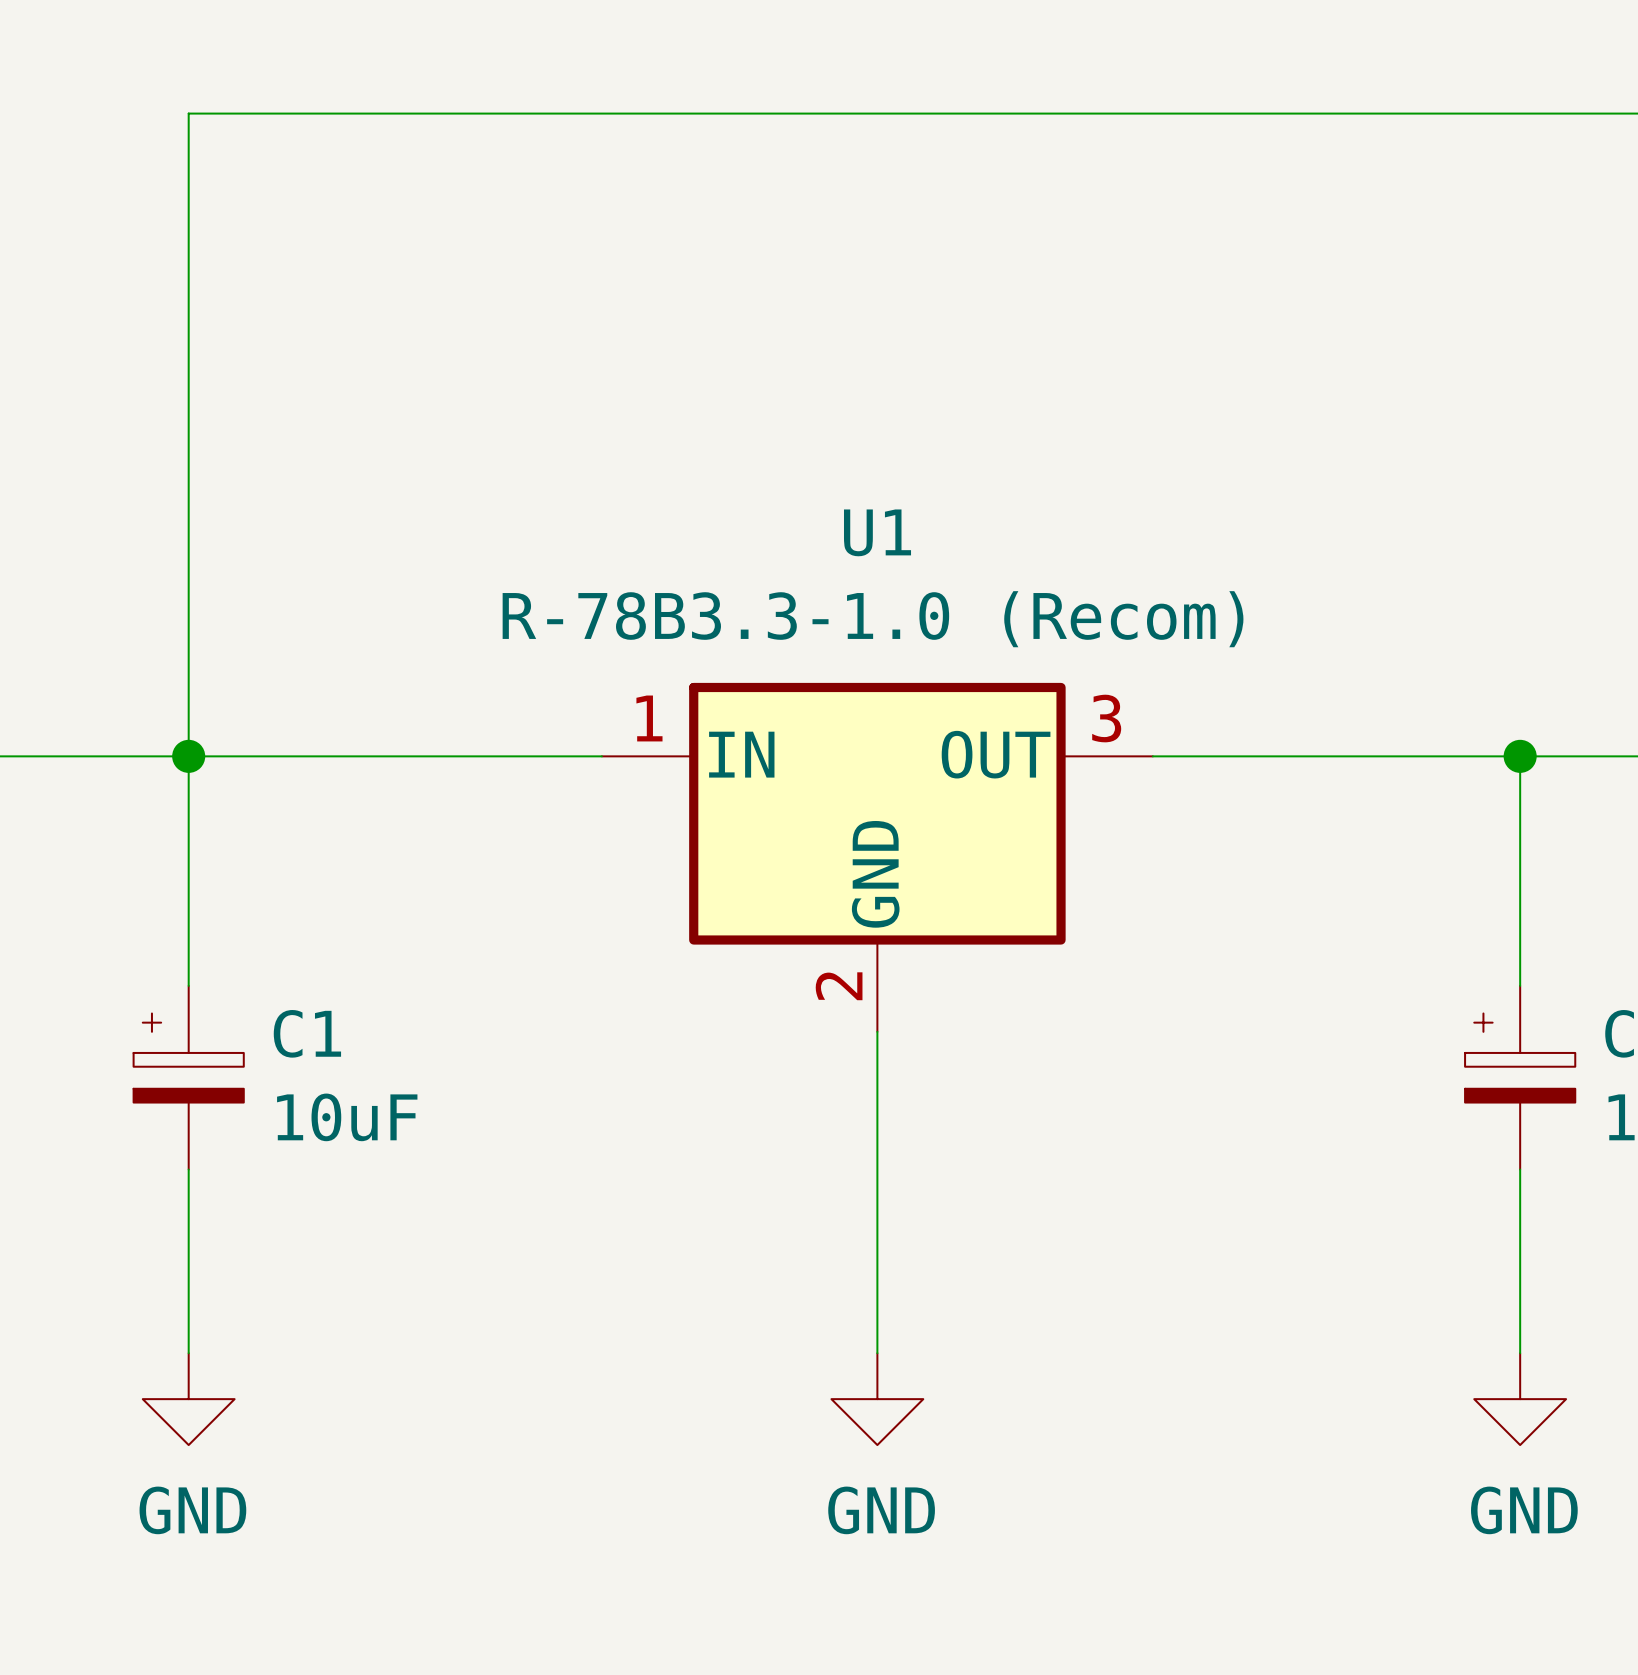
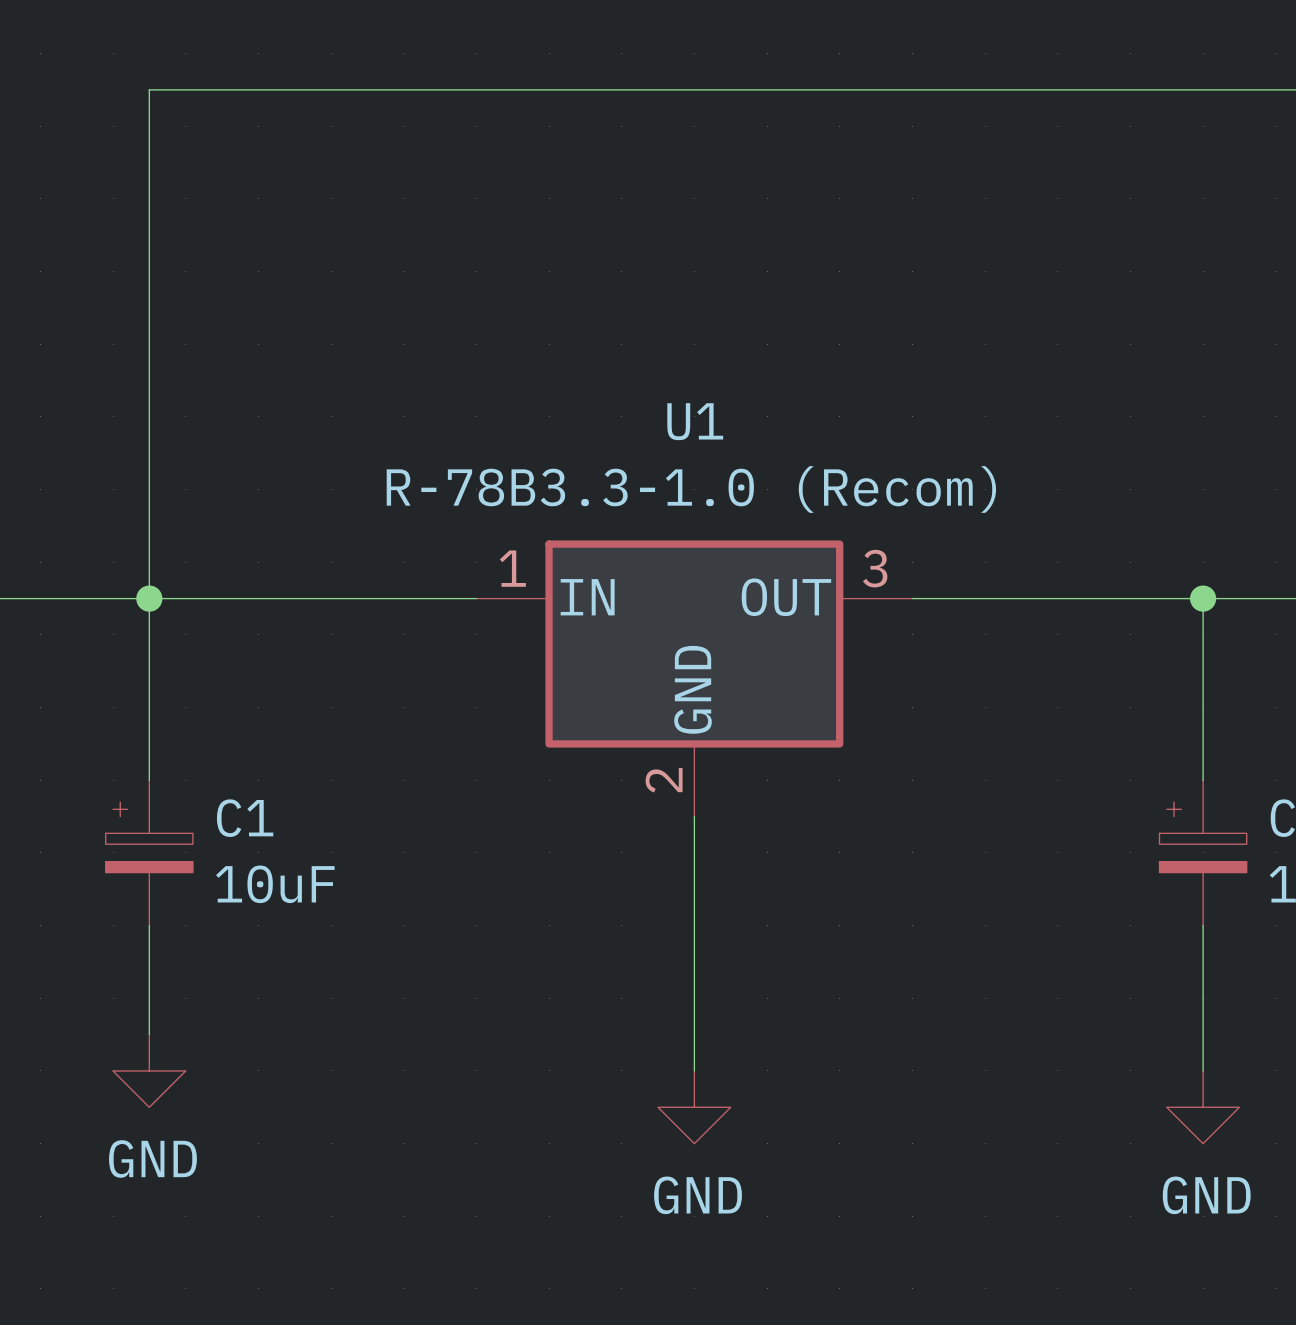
power symbol position: GND (188, 1399) -> GND (149, 1070)

